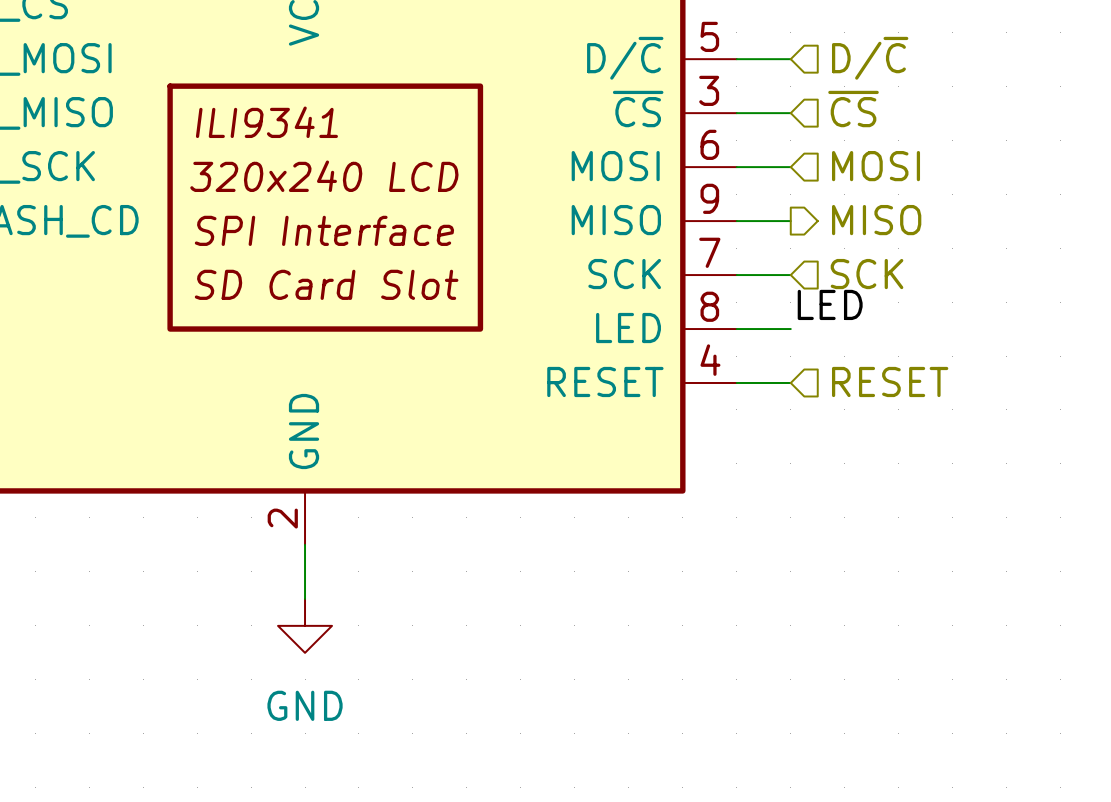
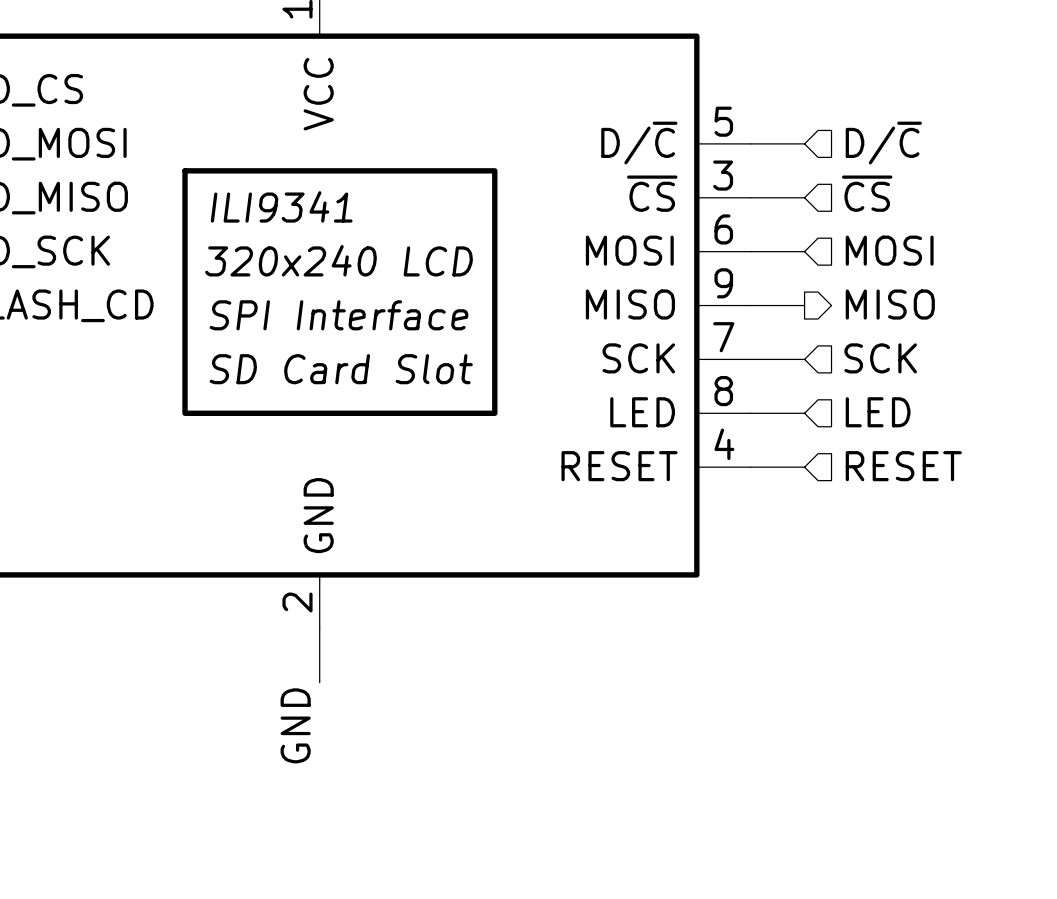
label: LED (830, 304) -> none
hierarchical label: none -> LED (878, 412)
power symbol: GND (305, 625) -> none
label: none -> GND (295, 725)

